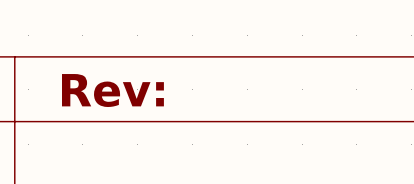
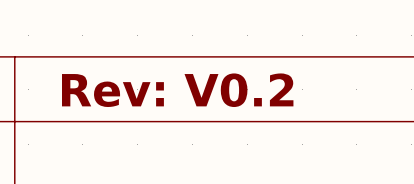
title block: Rev: (112, 90) -> Rev: V0.2 (177, 90)

